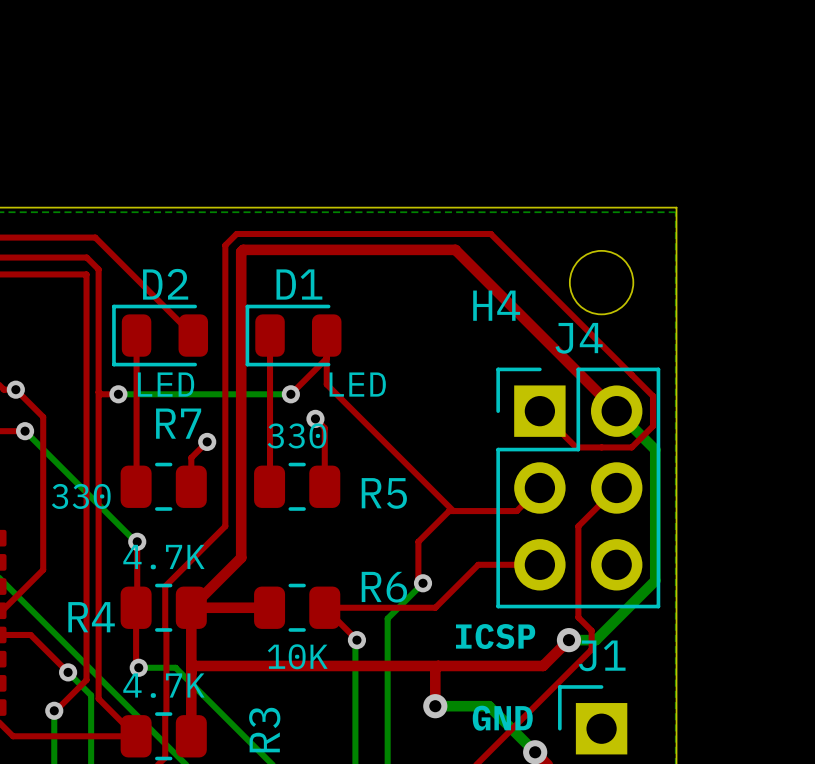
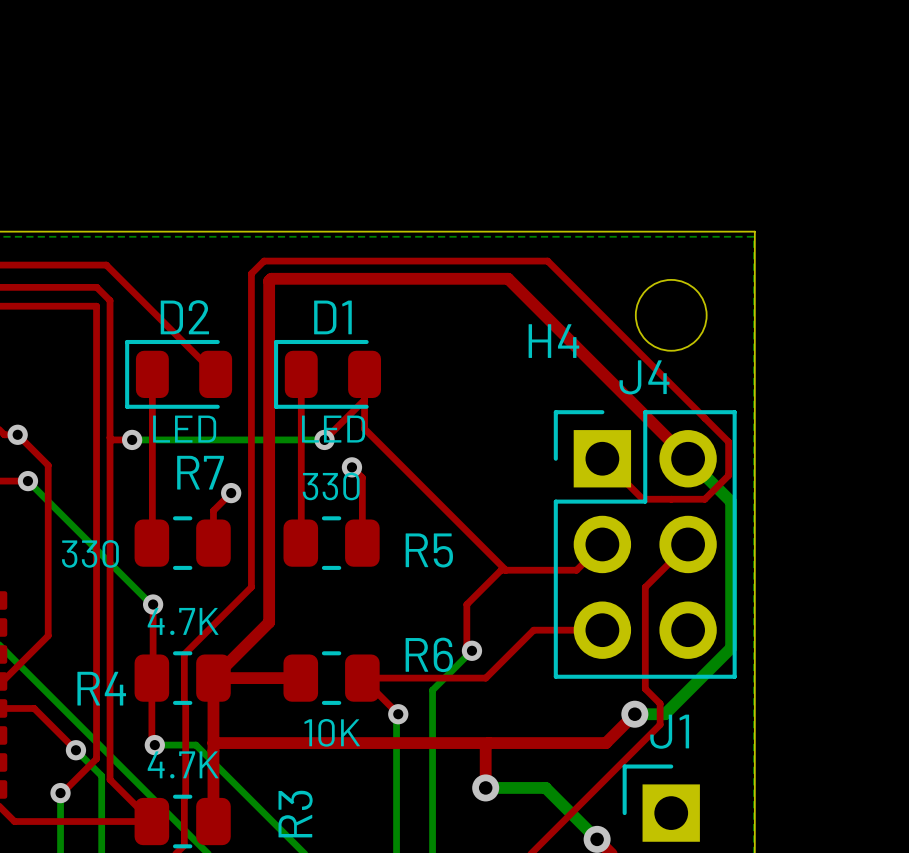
D1 value position: LED (357, 384) -> LED (333, 429)
text: ICSP (495, 636) -> none
text: GND (502, 718) -> none

